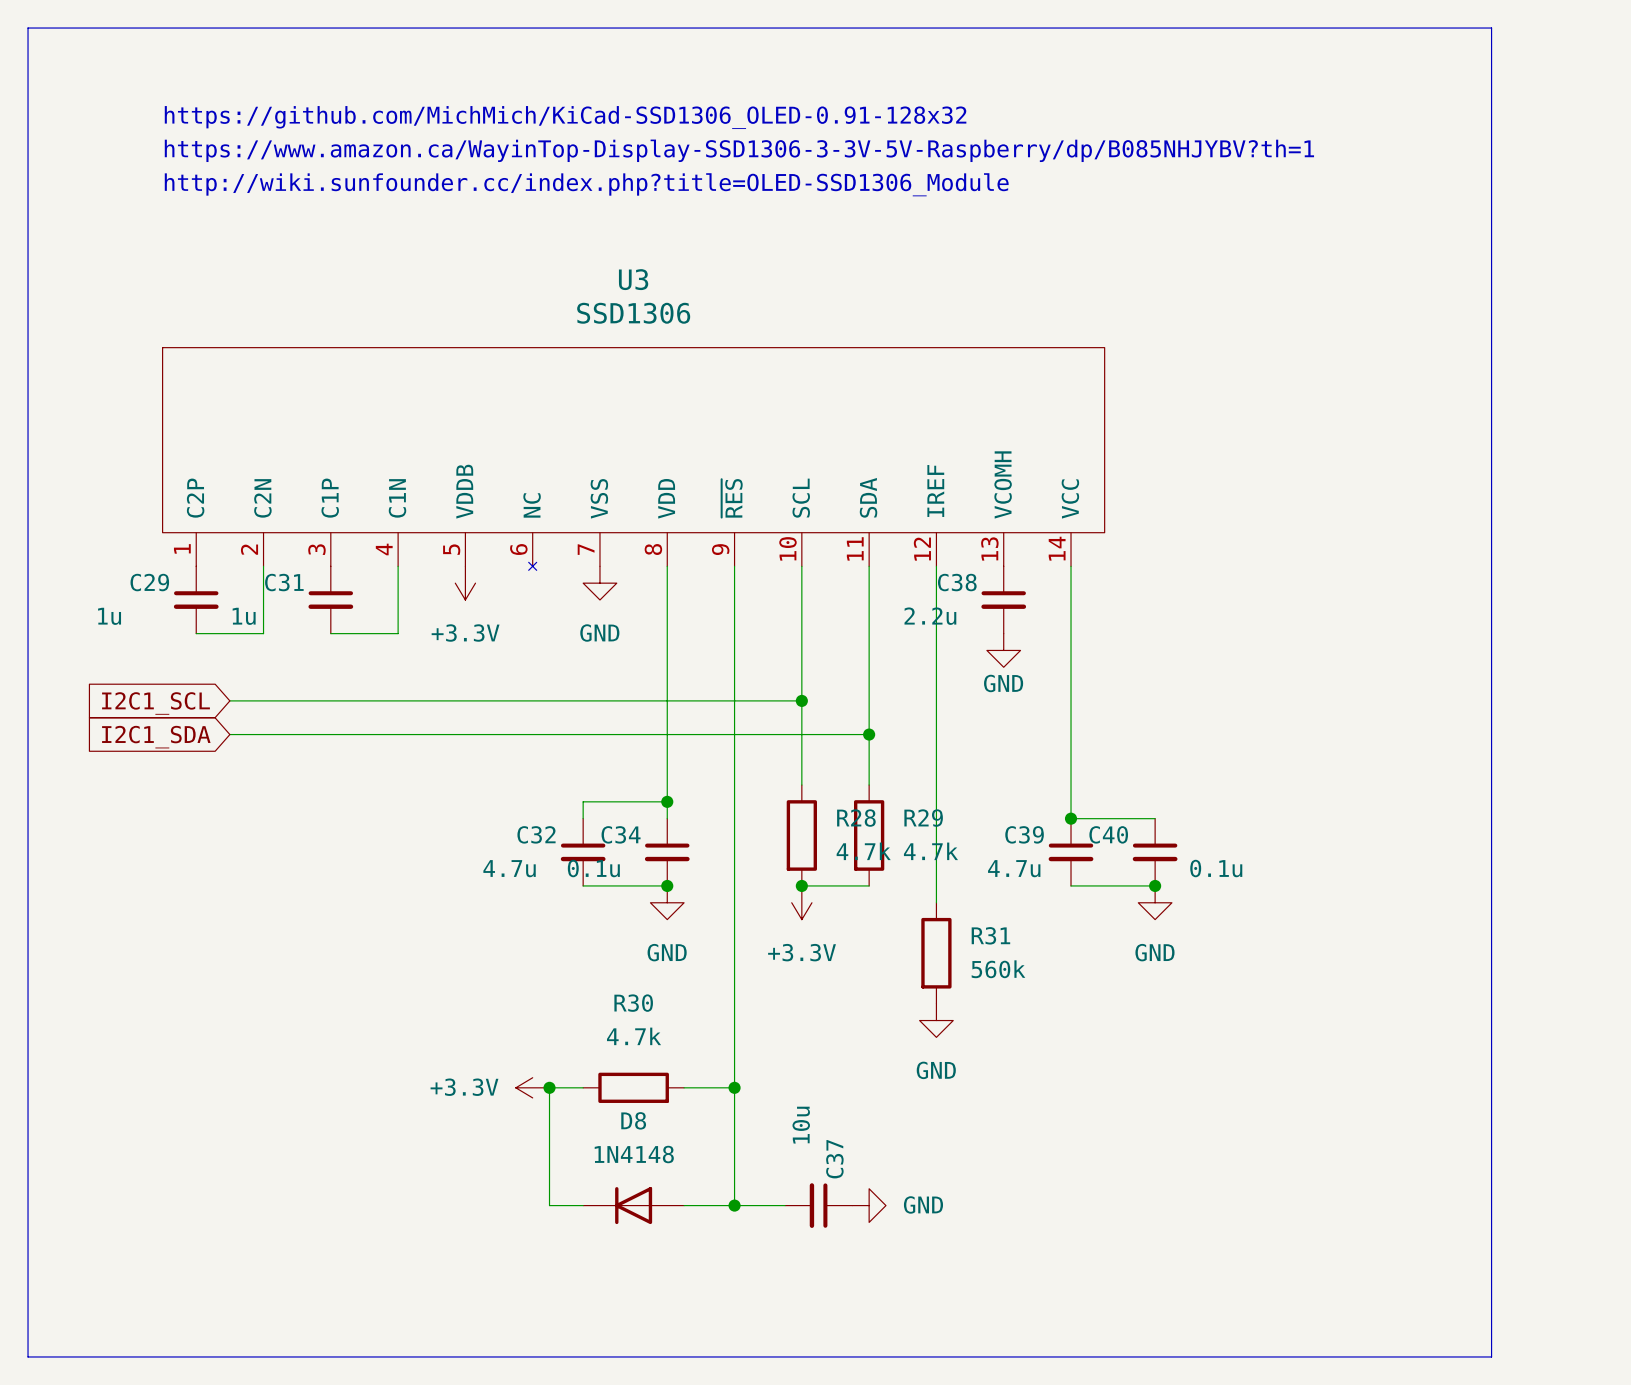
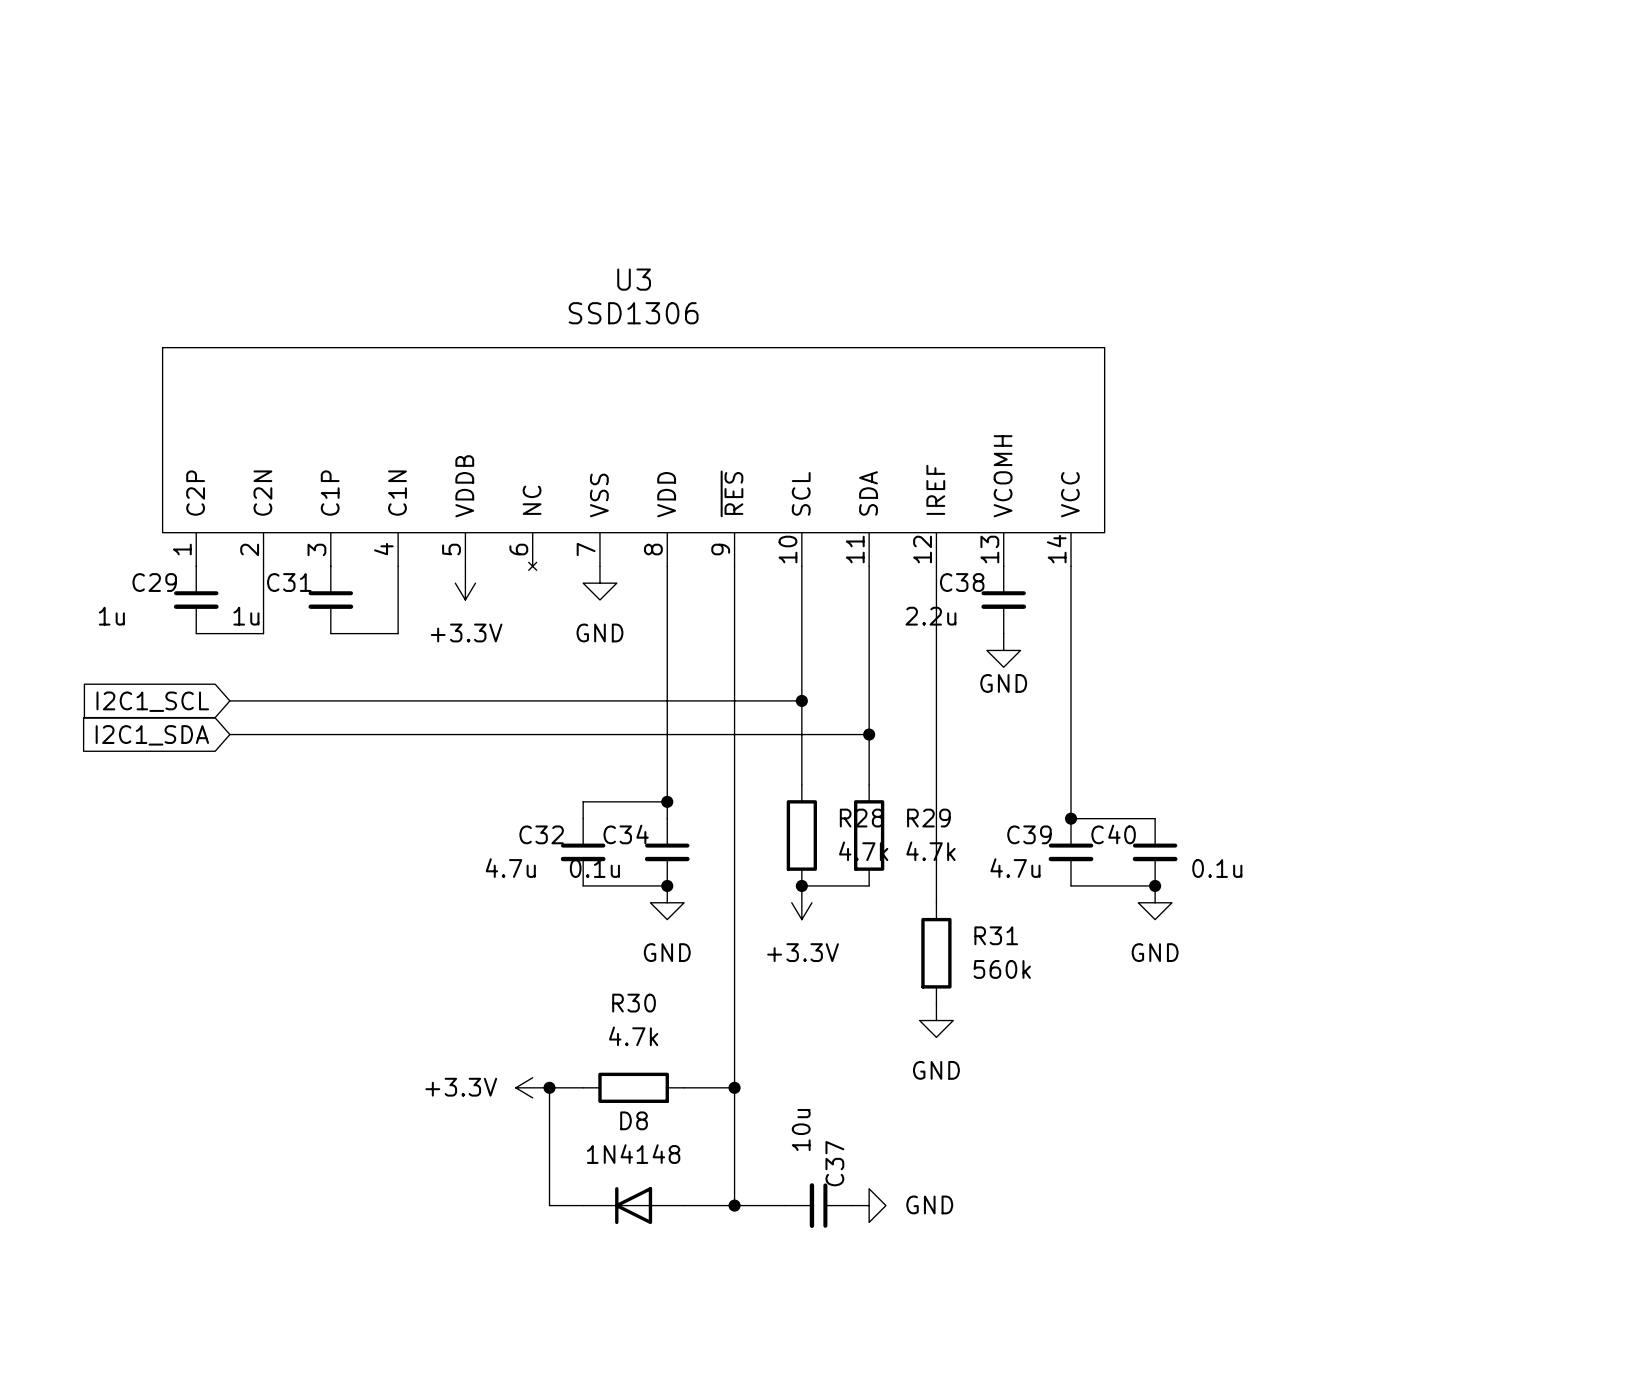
line: (28, 28) (1491, 28) (1491, 1356) (28, 1356) (28, 28) -> none
text: https://github.com/MichMich/KiCad-SSD1306_OLED-0.91-128x32 (565, 117) -> none
text: https://www.amazon.ca/WayinTop-Display-SSD1306-3-3V-5V-Raspberry/dp/B085NHJYBV?th=1 (739, 150) -> none
text: http://wiki.sunfounder.cc/index.php?title=OLED-SSD1306_Module (586, 184) -> none

